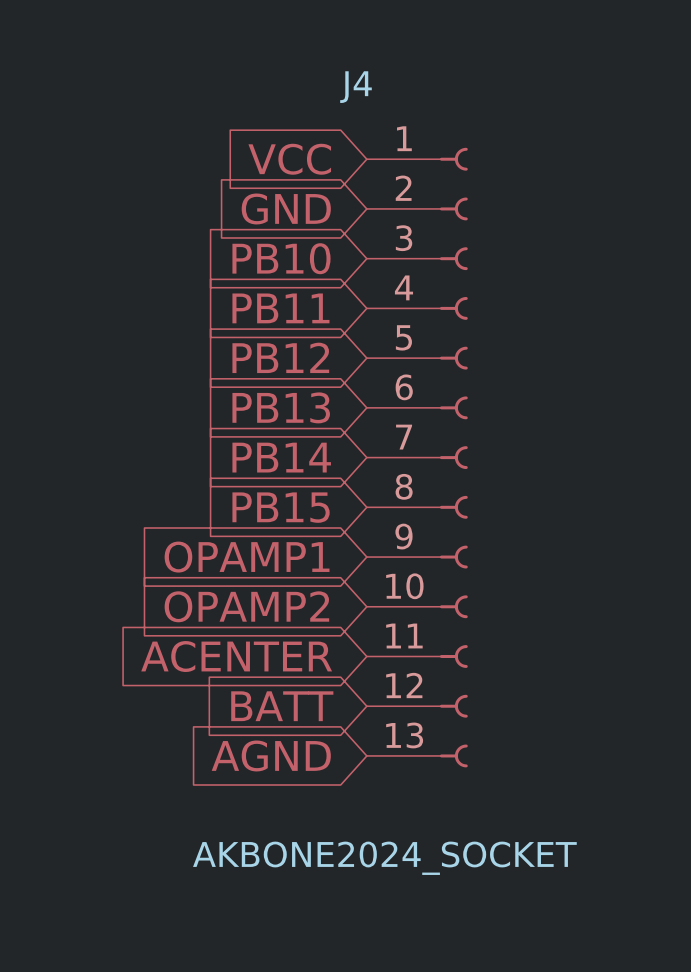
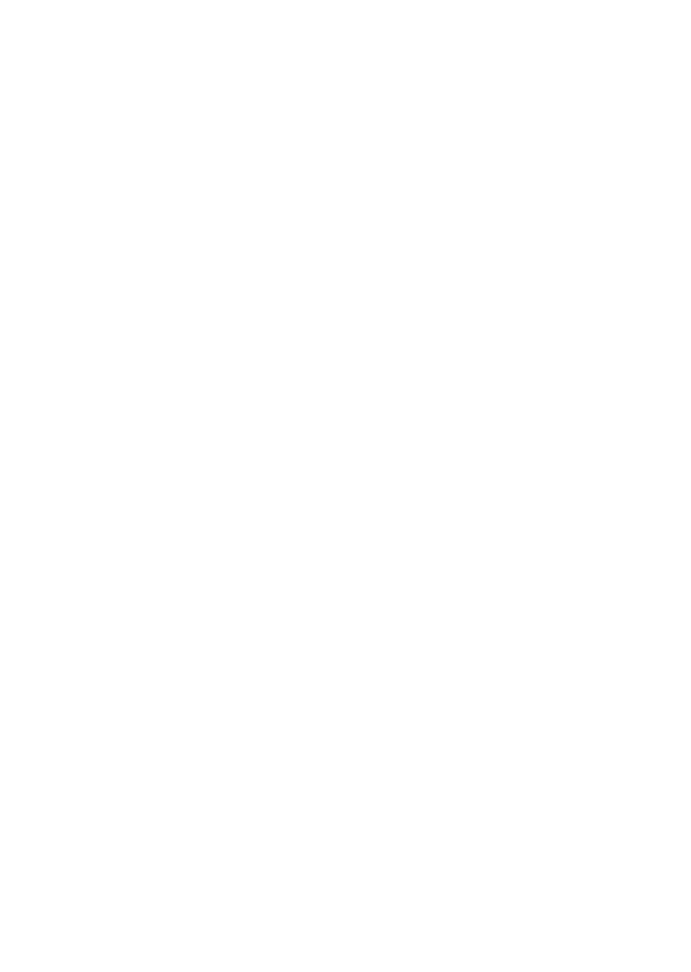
global label: VCC (289, 159) -> none
global label: GND (286, 208) -> none
global label: PB10 (281, 258) -> none
global label: PB11 (280, 308) -> none
global label: PB12 (280, 357) -> none
global label: PB13 (281, 407) -> none
global label: PB14 (281, 457) -> none
J4: AKBONE2024_SOCKET (417, 457) -> none
global label: PB15 (281, 507) -> none
global label: OPAMP1 (247, 557) -> none
global label: OPAMP2 (246, 606) -> none
global label: ACENTER (236, 656) -> none
global label: BATT (282, 706) -> none
global label: AGND (271, 755) -> none

